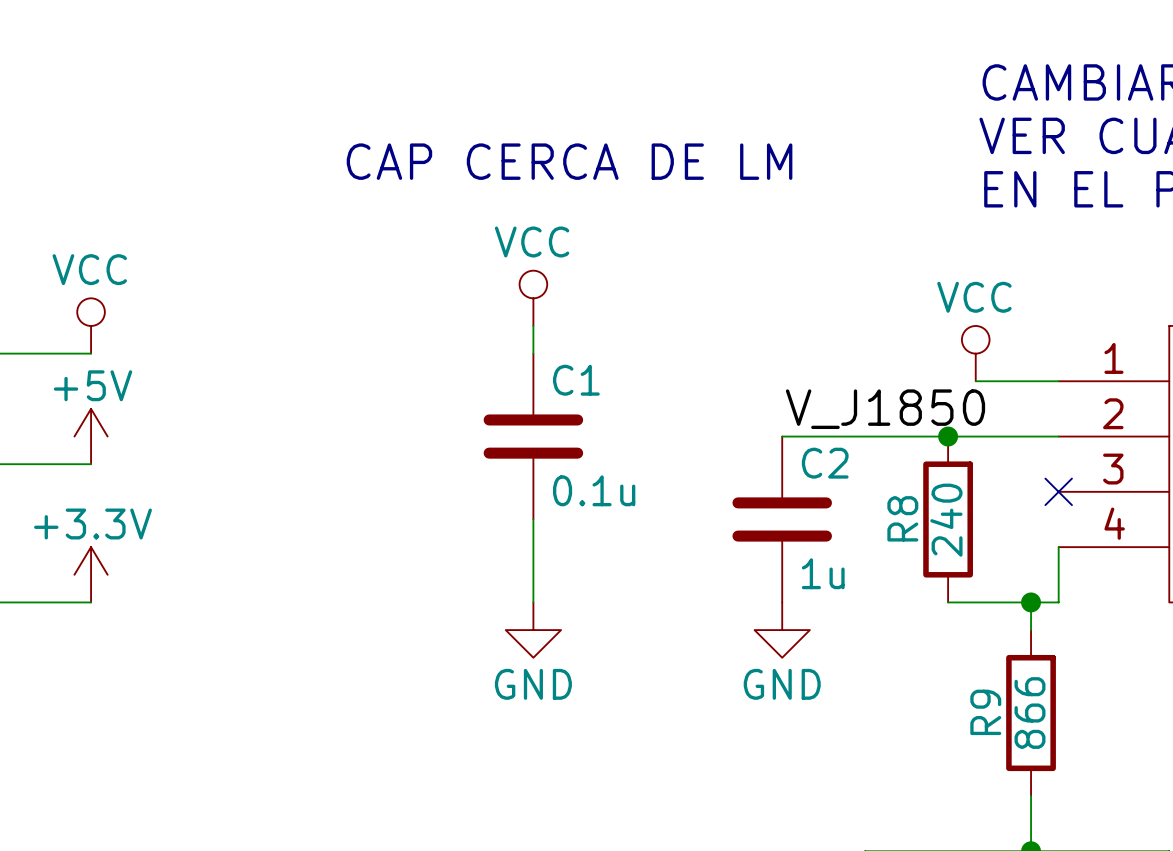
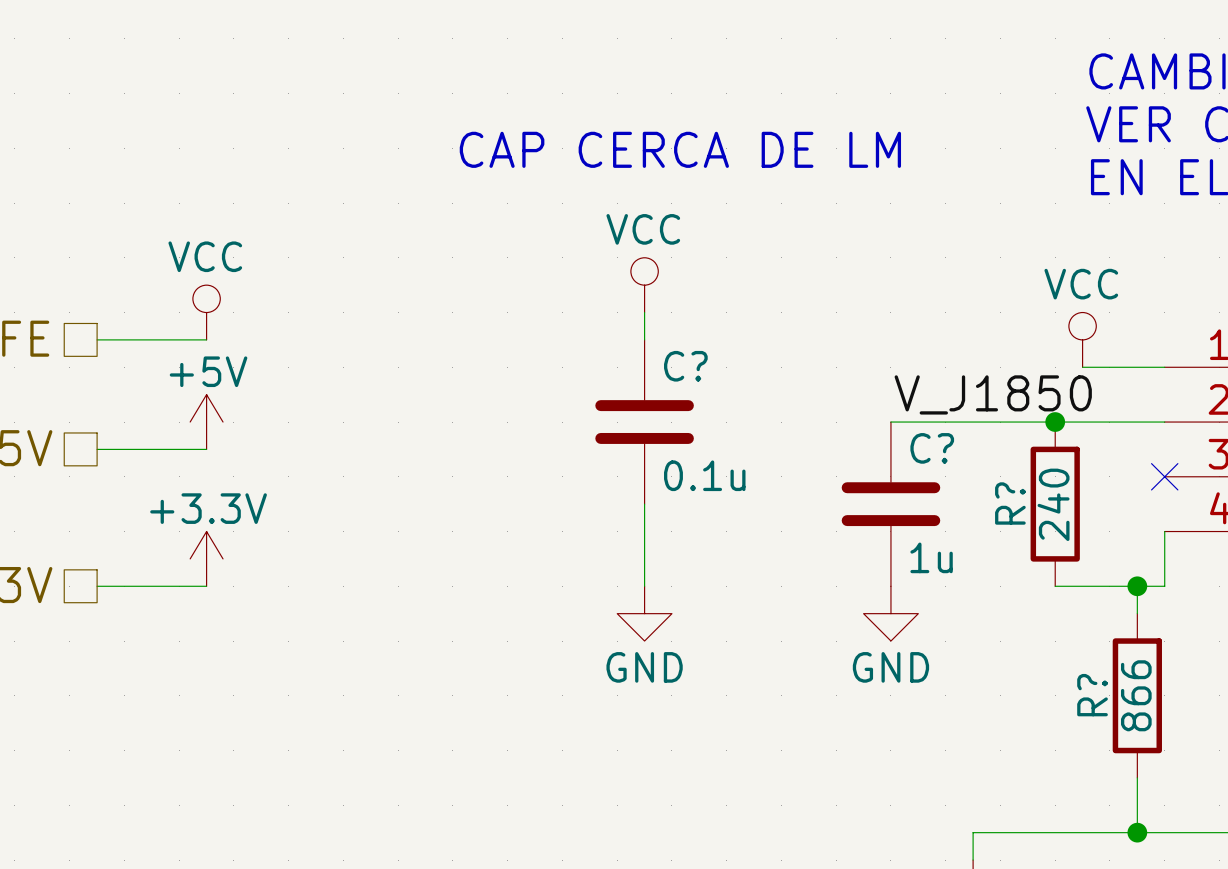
C1 name: C1 (576, 380) -> C? (685, 366)
C2 name: C2 (825, 463) -> C? (932, 448)
R8 name: R8 (902, 518) -> R? (1010, 503)
R9 name: R9 (985, 712) -> R? (1092, 695)

